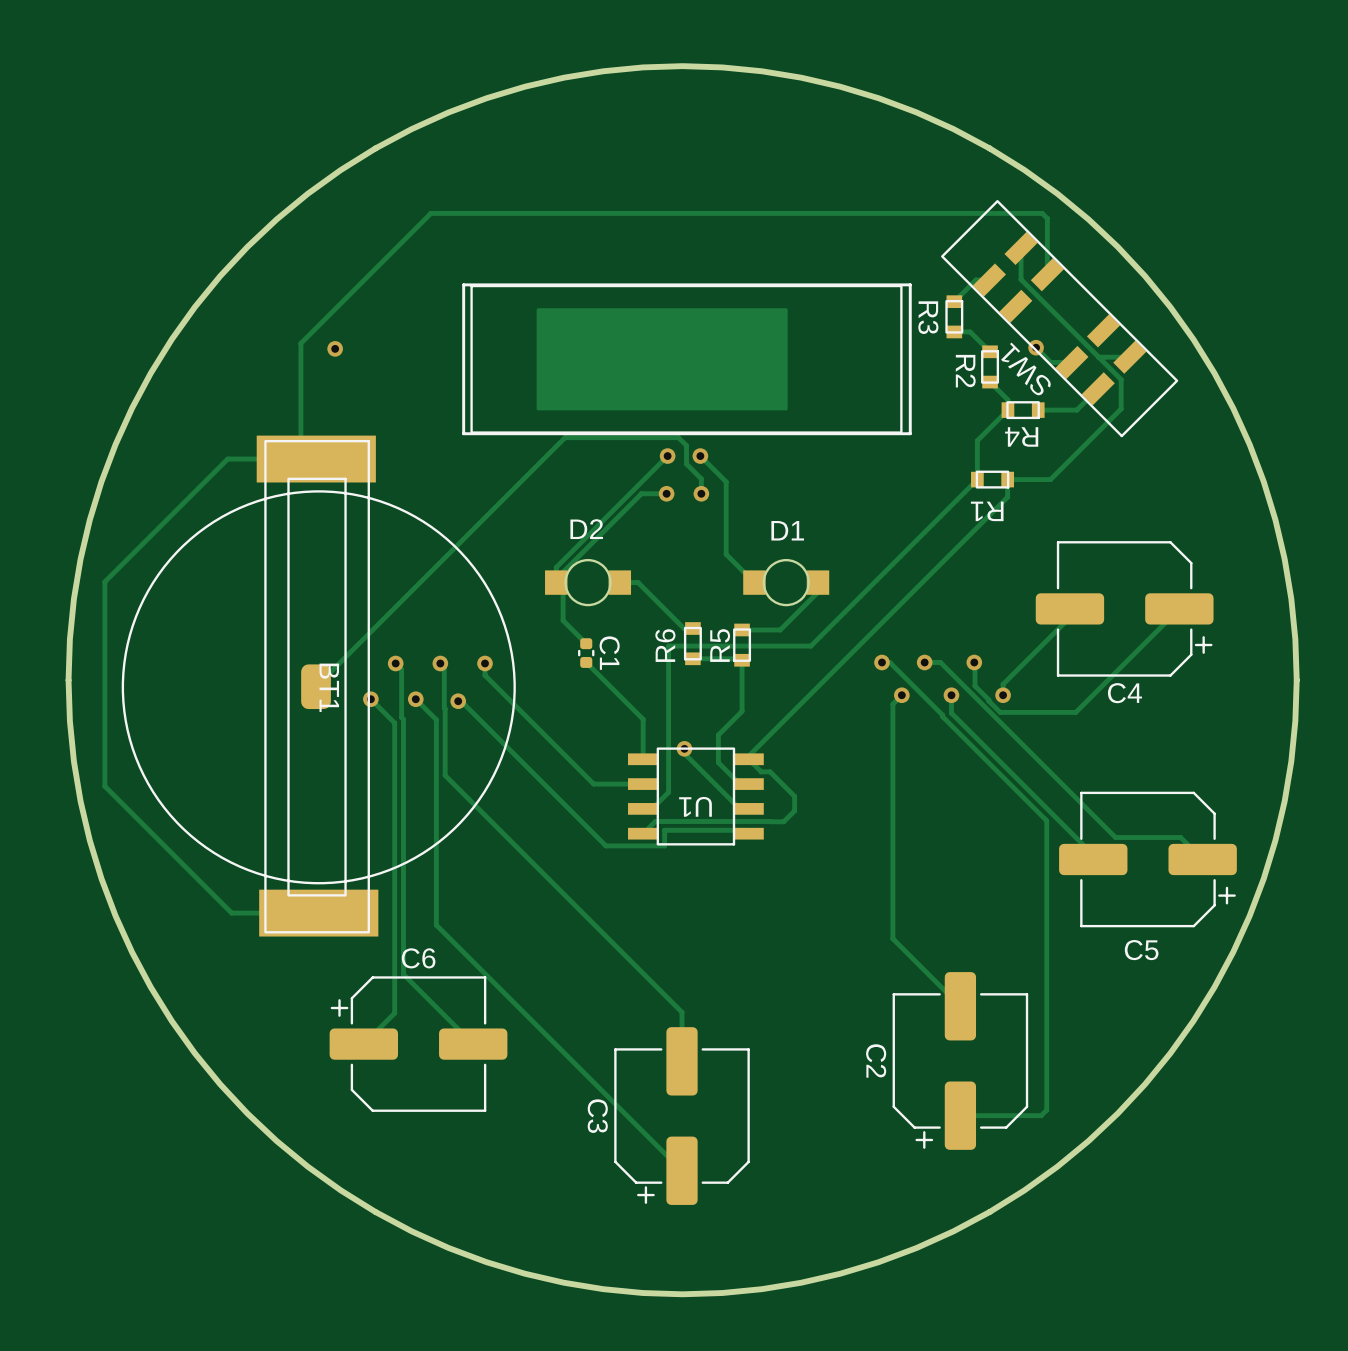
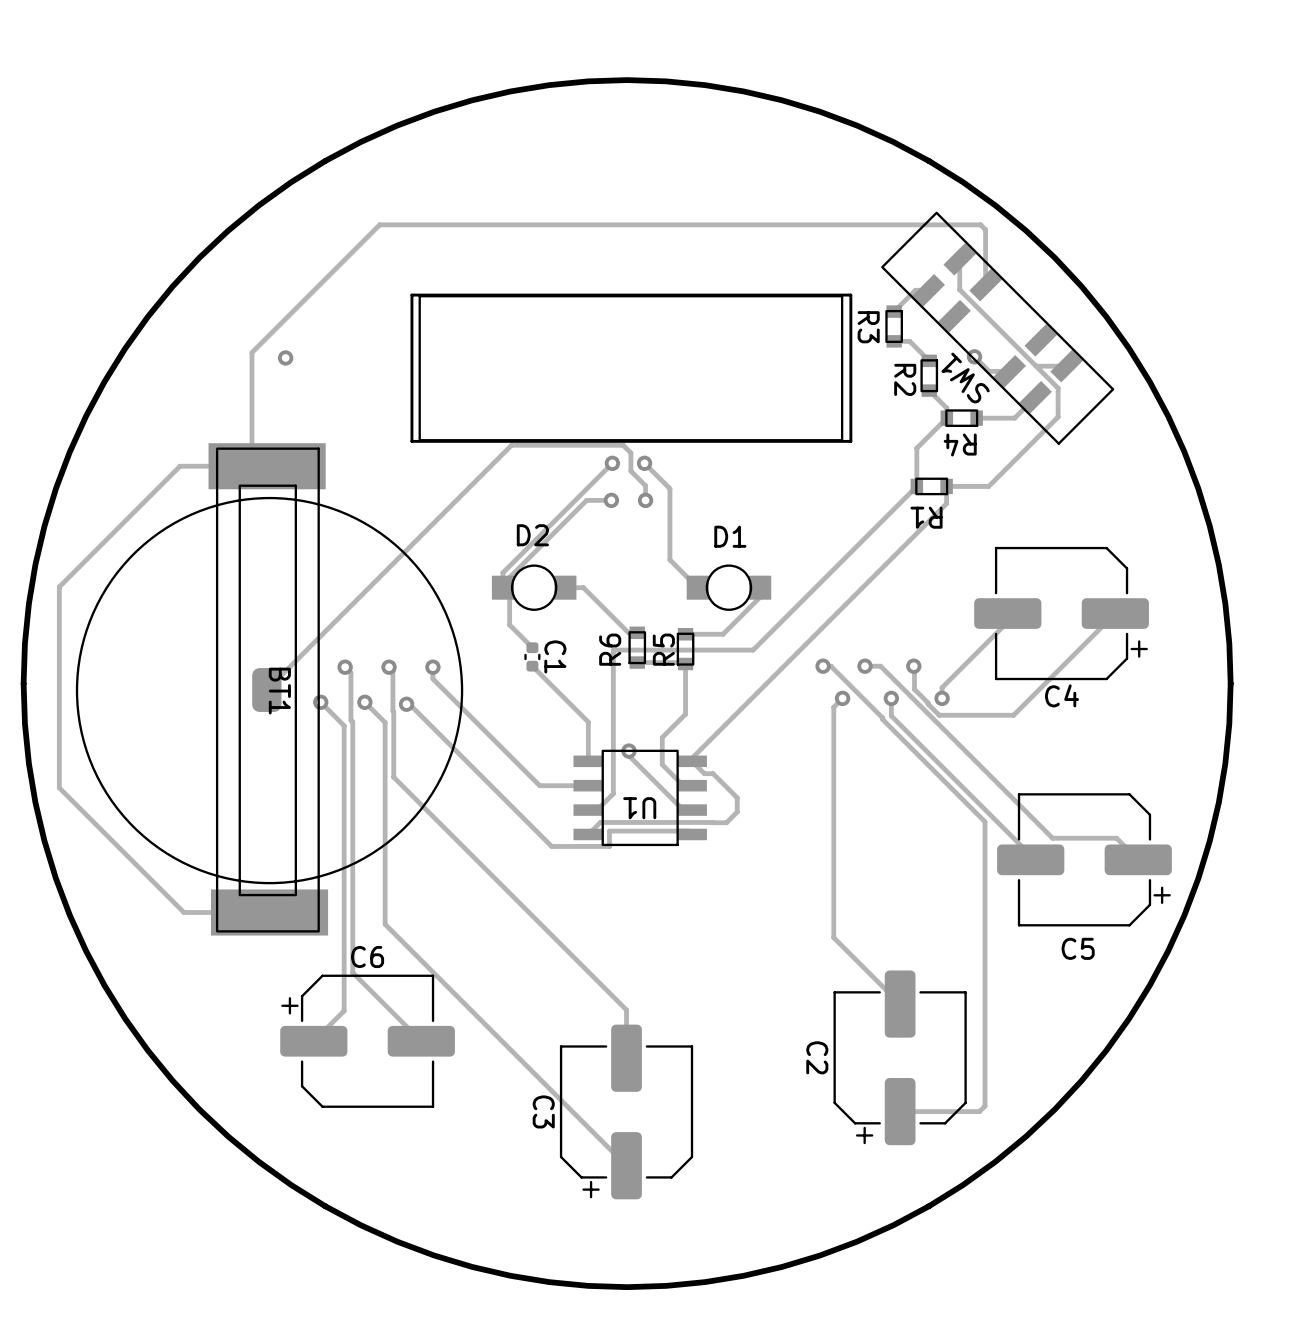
drawing: [536, 308, 788, 411] -> none

